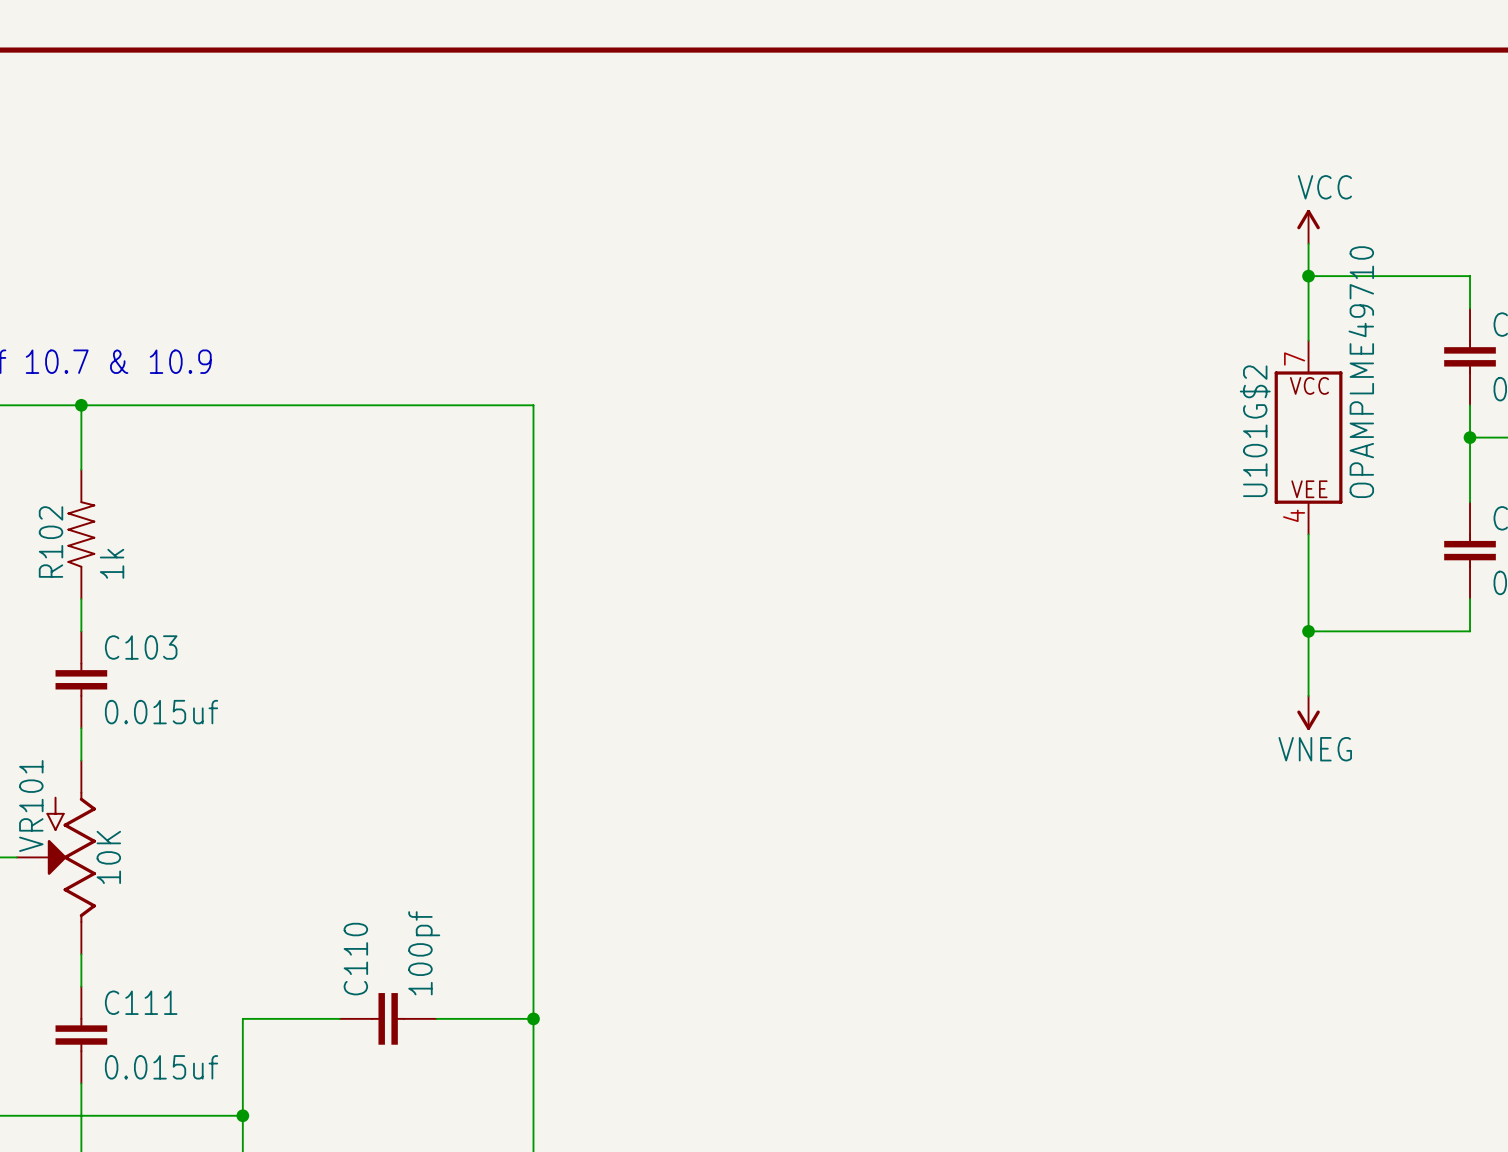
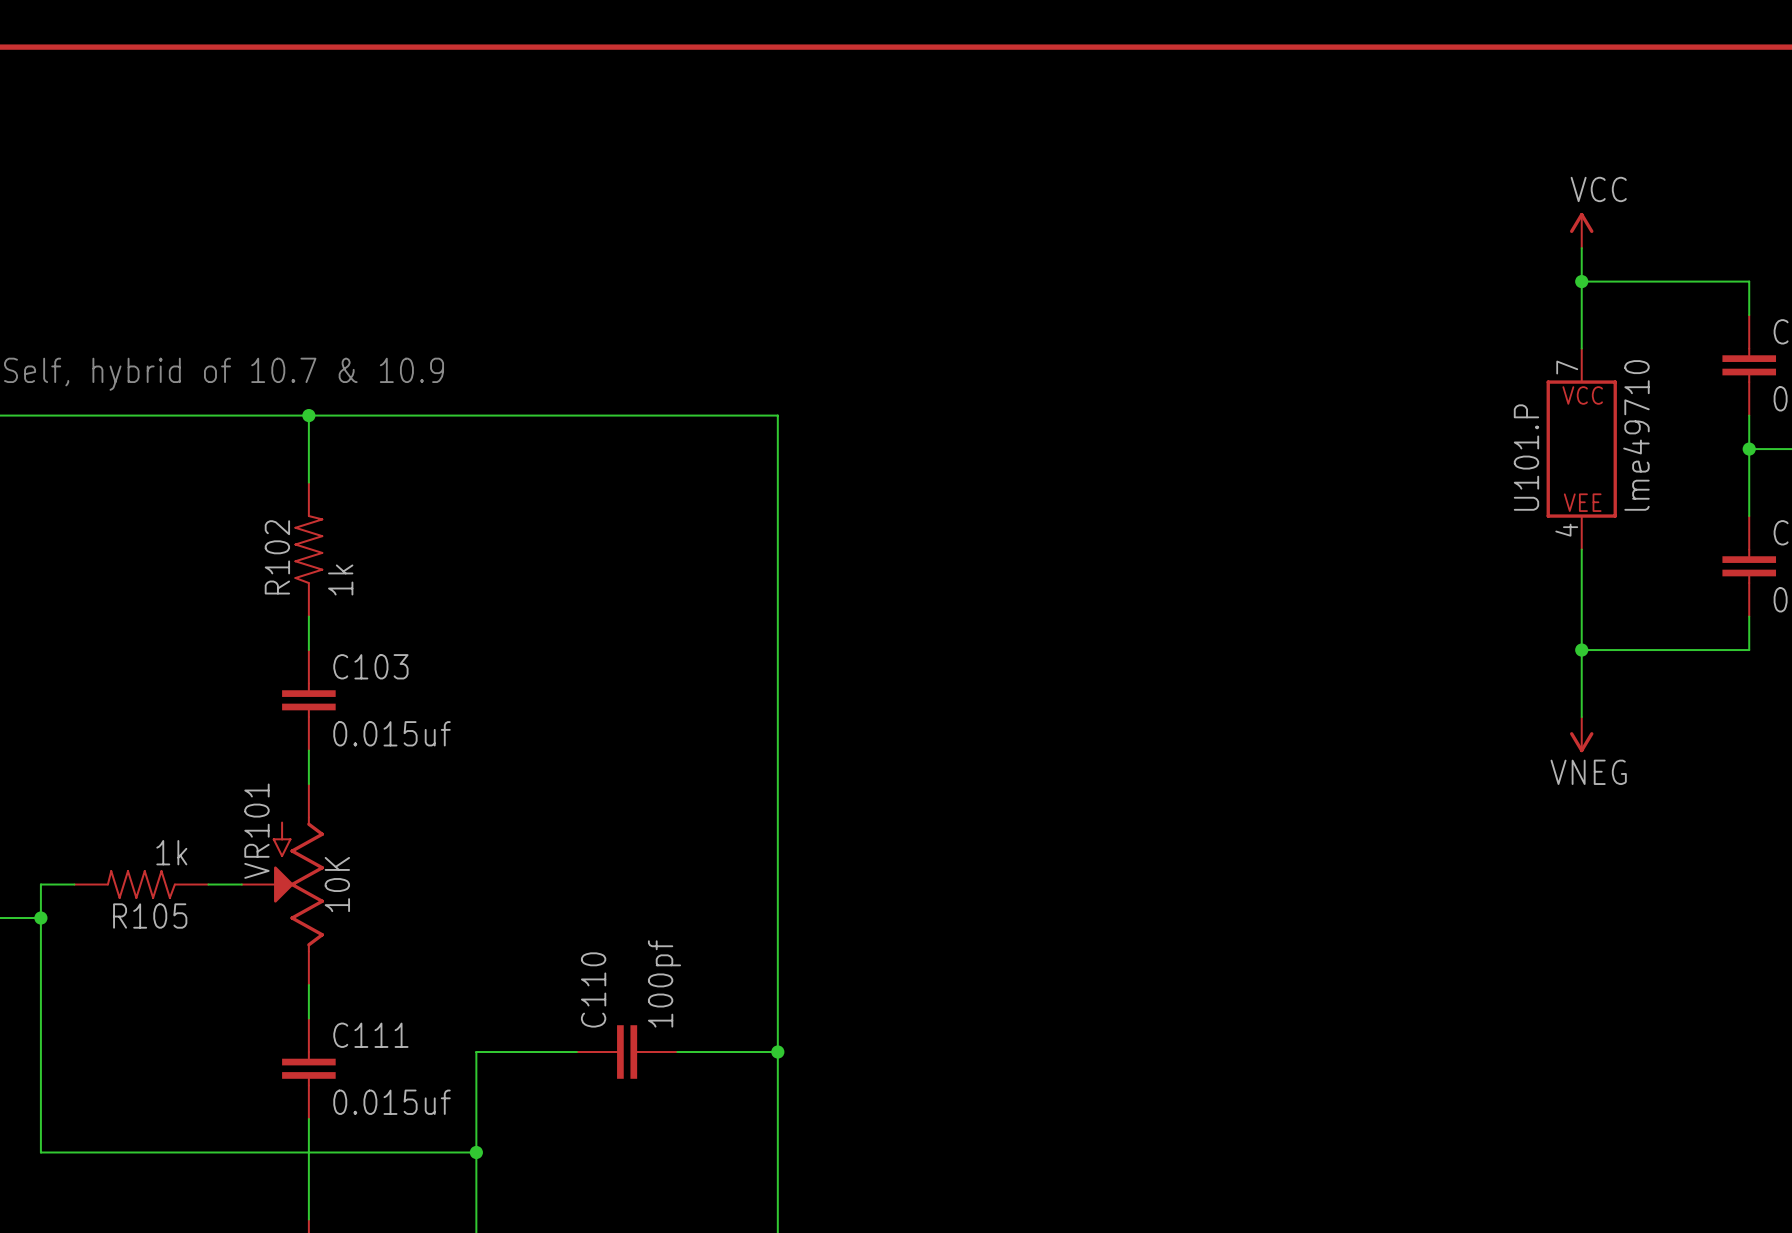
U101G$2 value: OPAMPLME49710 (1361, 372) -> lme49710 (1636, 435)
U101G$2 name: U101G$2 (1255, 431) -> U101.P (1526, 457)

